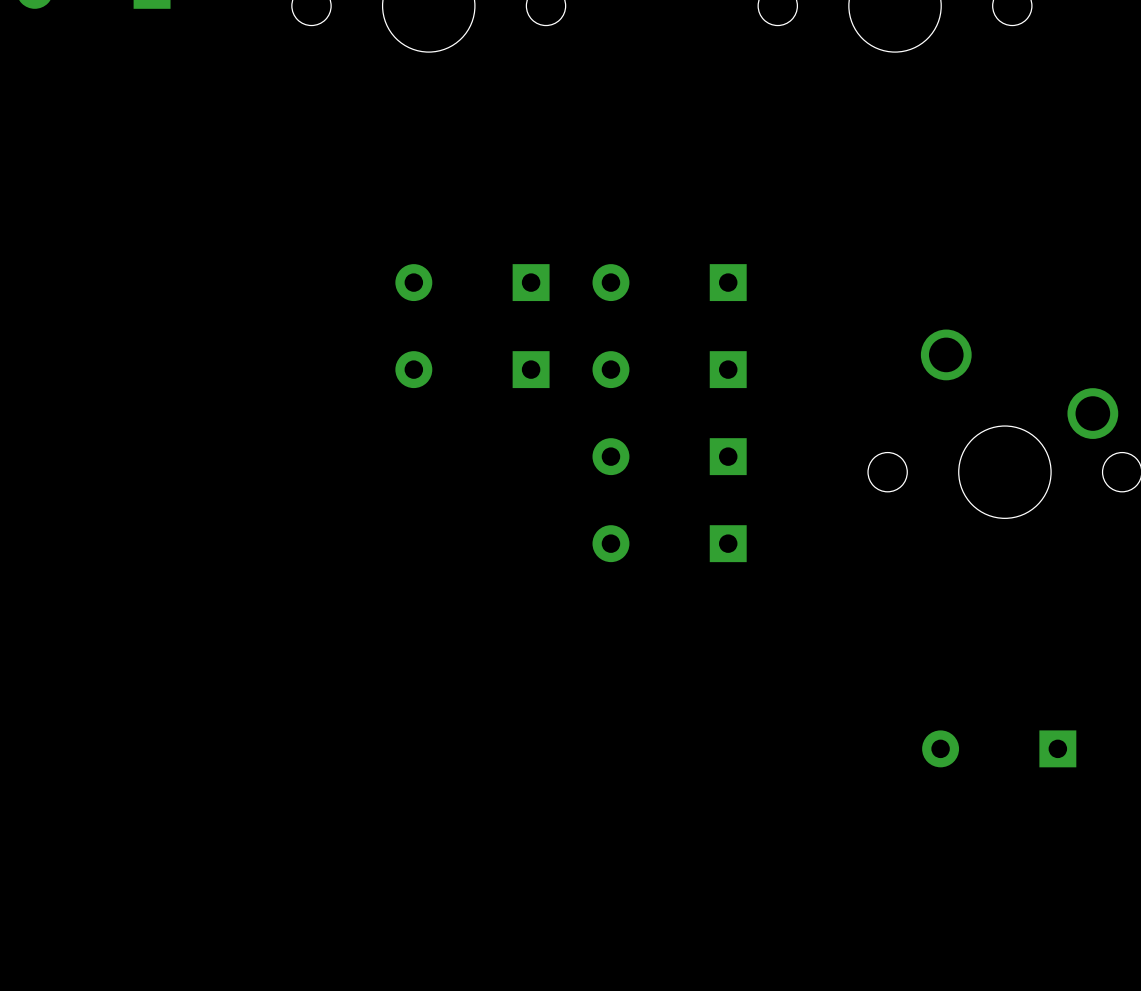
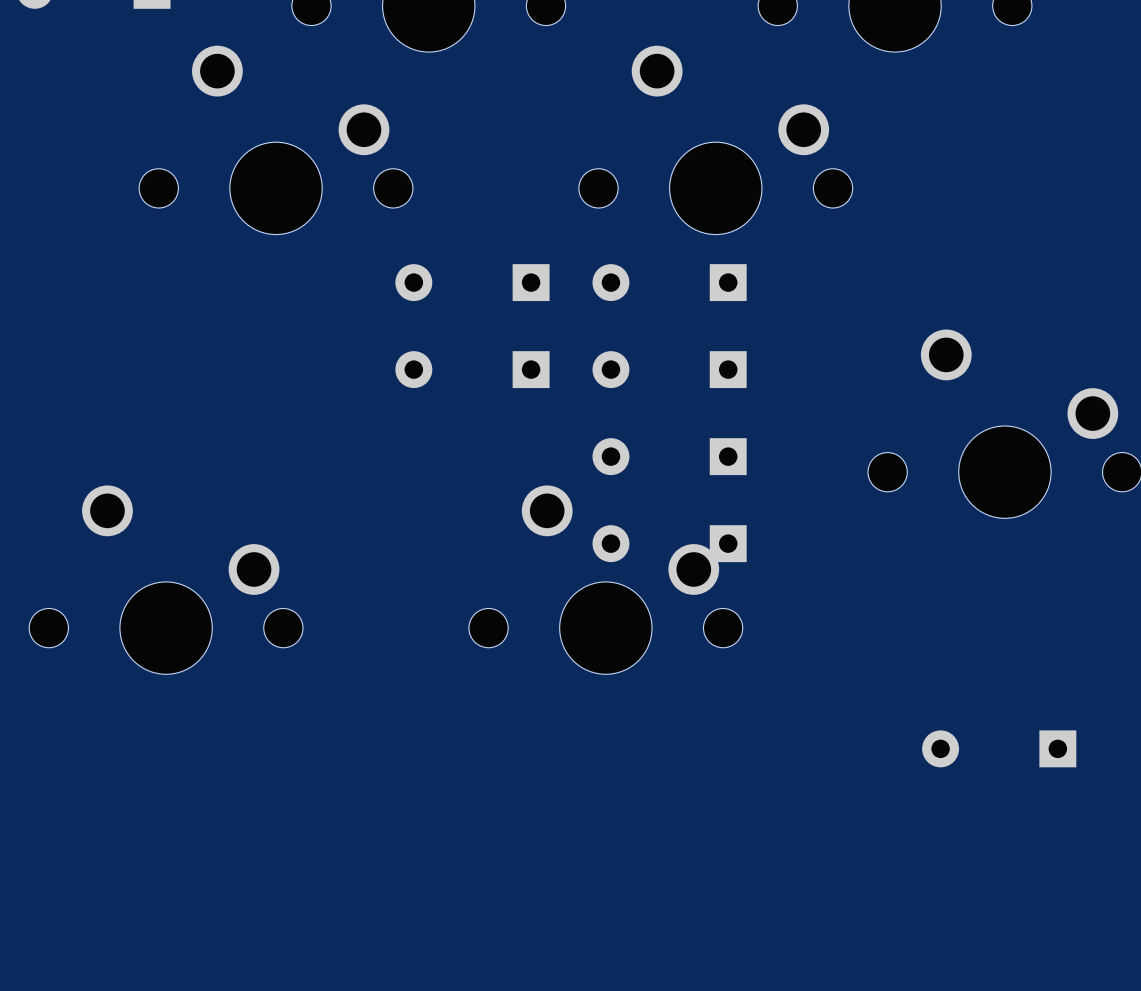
part: none -> (276, 140)
part: none -> (715, 140)
part: none -> (166, 579)
part: none -> (605, 579)

